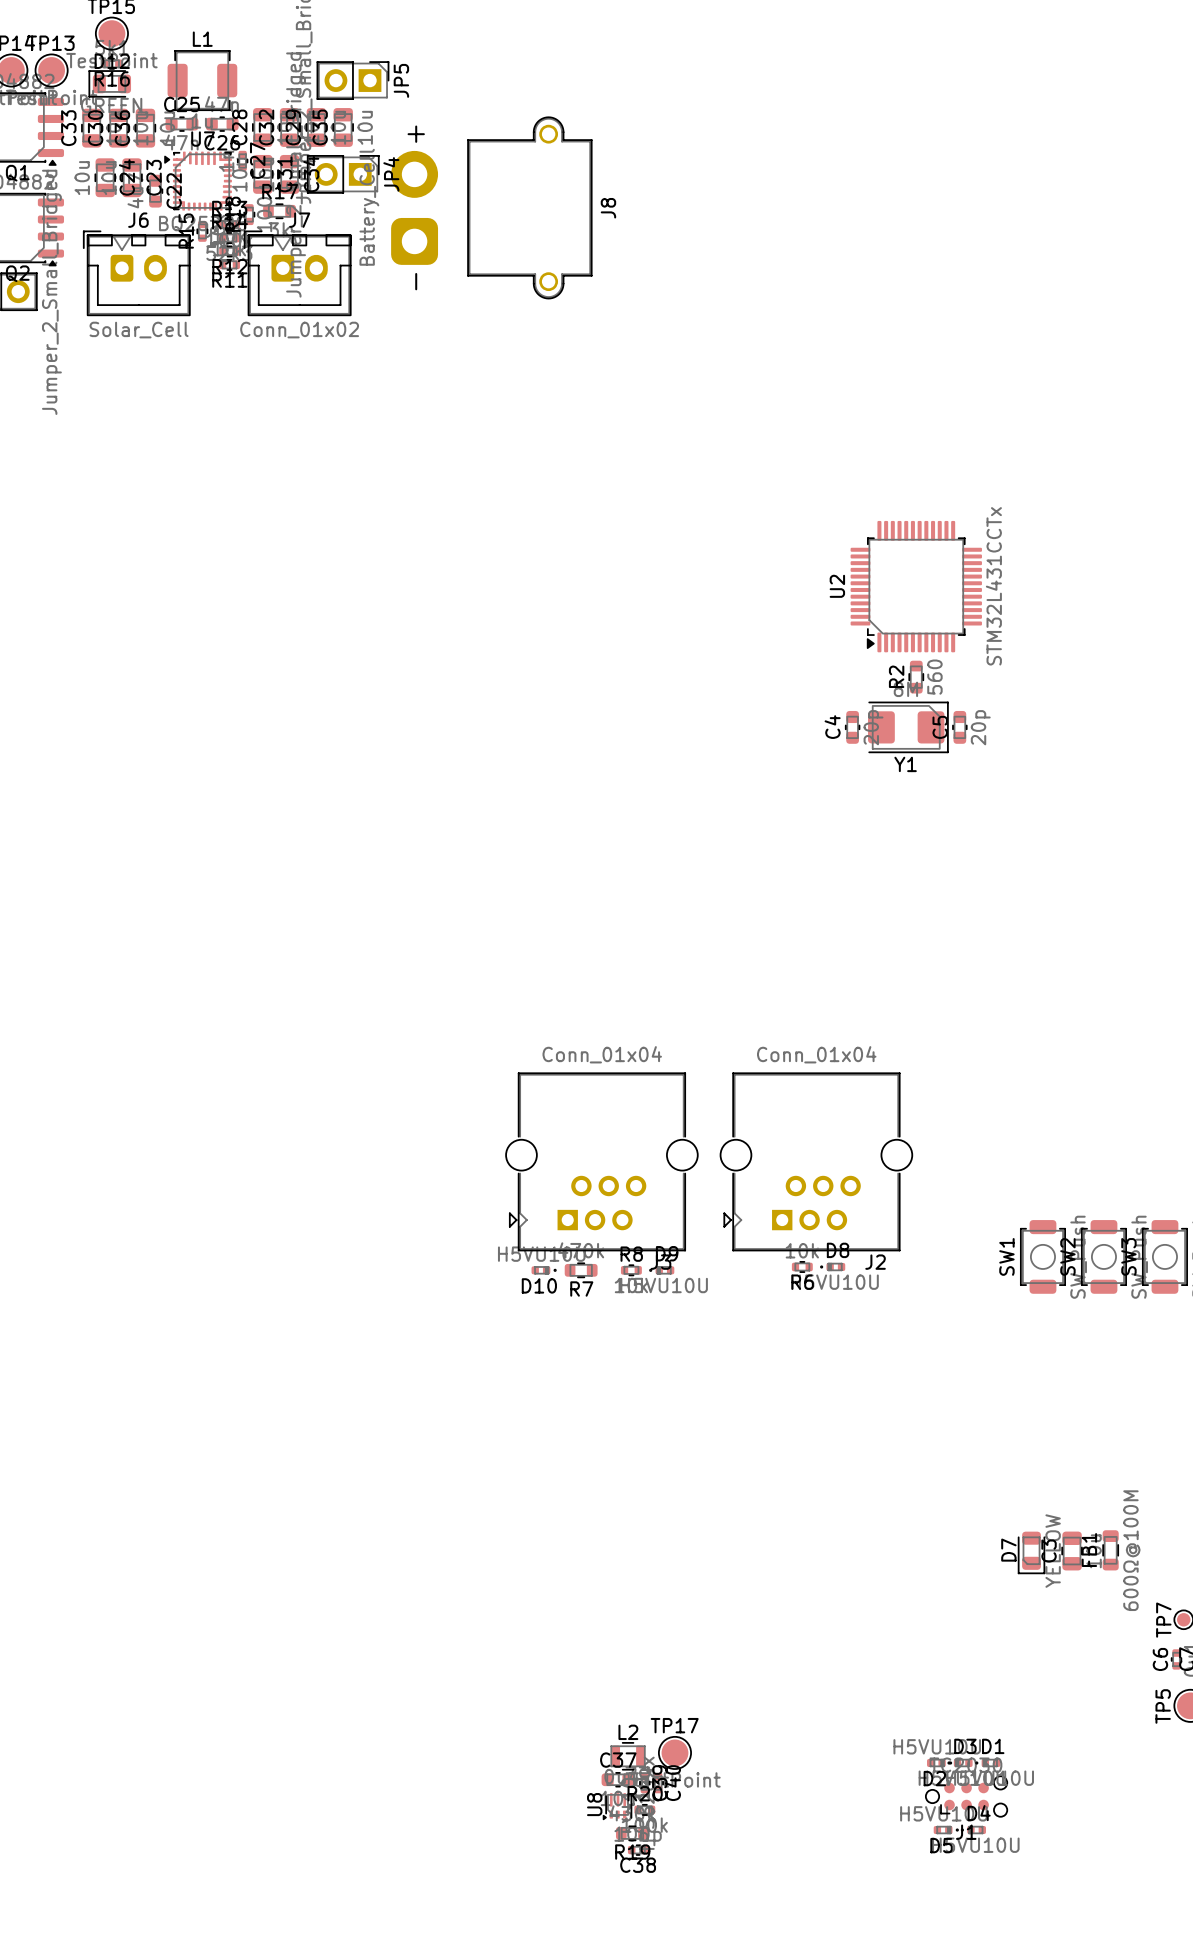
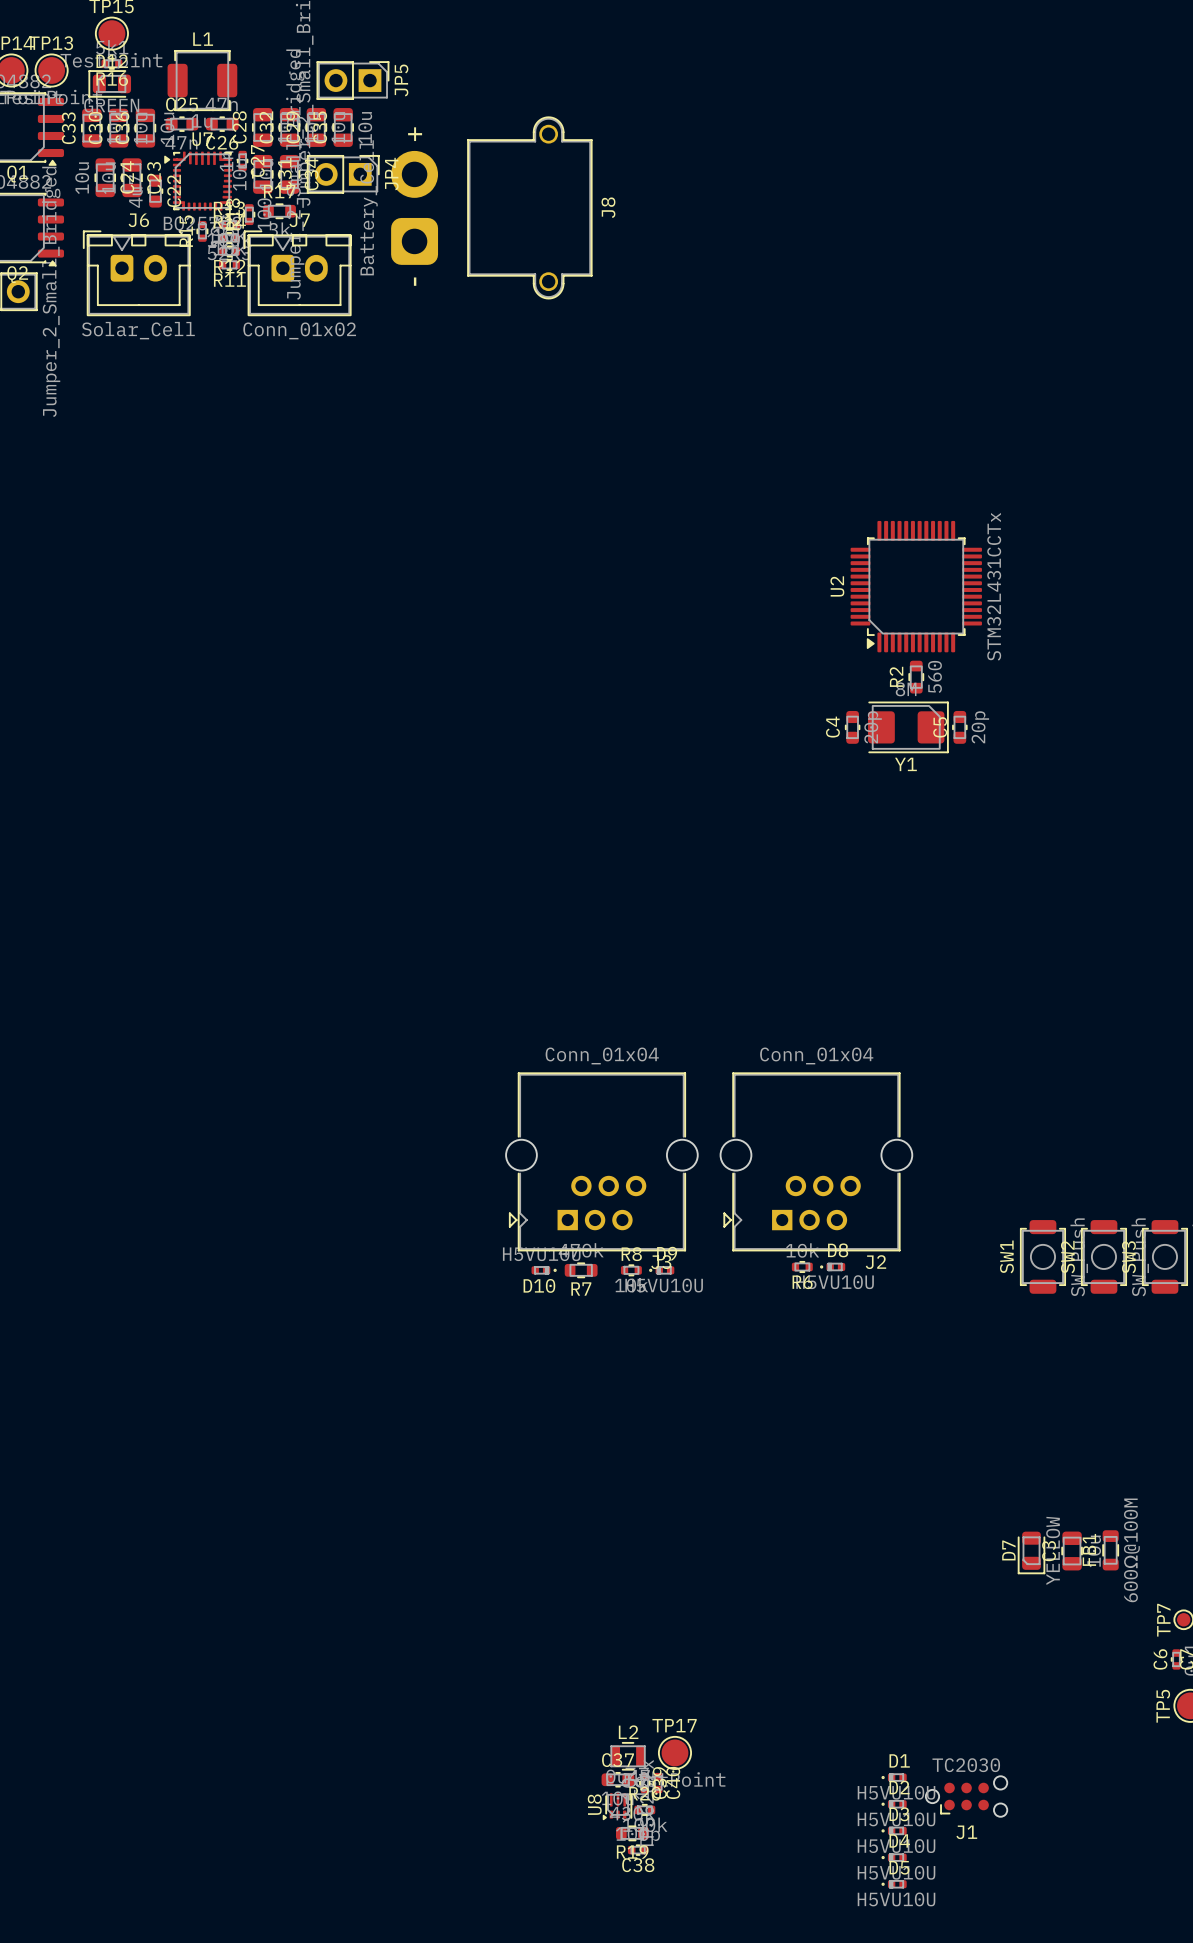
D2 rotation: 0° (939, 1762) -> 180° (894, 1804)
D2 position: (939, 1762) -> (894, 1804)
D3 position: (960, 1762) -> (894, 1830)
D1 position: (987, 1762) -> (894, 1777)
D5 rotation: 0° (946, 1830) -> 180° (894, 1884)
D5 position: (946, 1830) -> (894, 1884)
D4 position: (973, 1830) -> (894, 1857)

